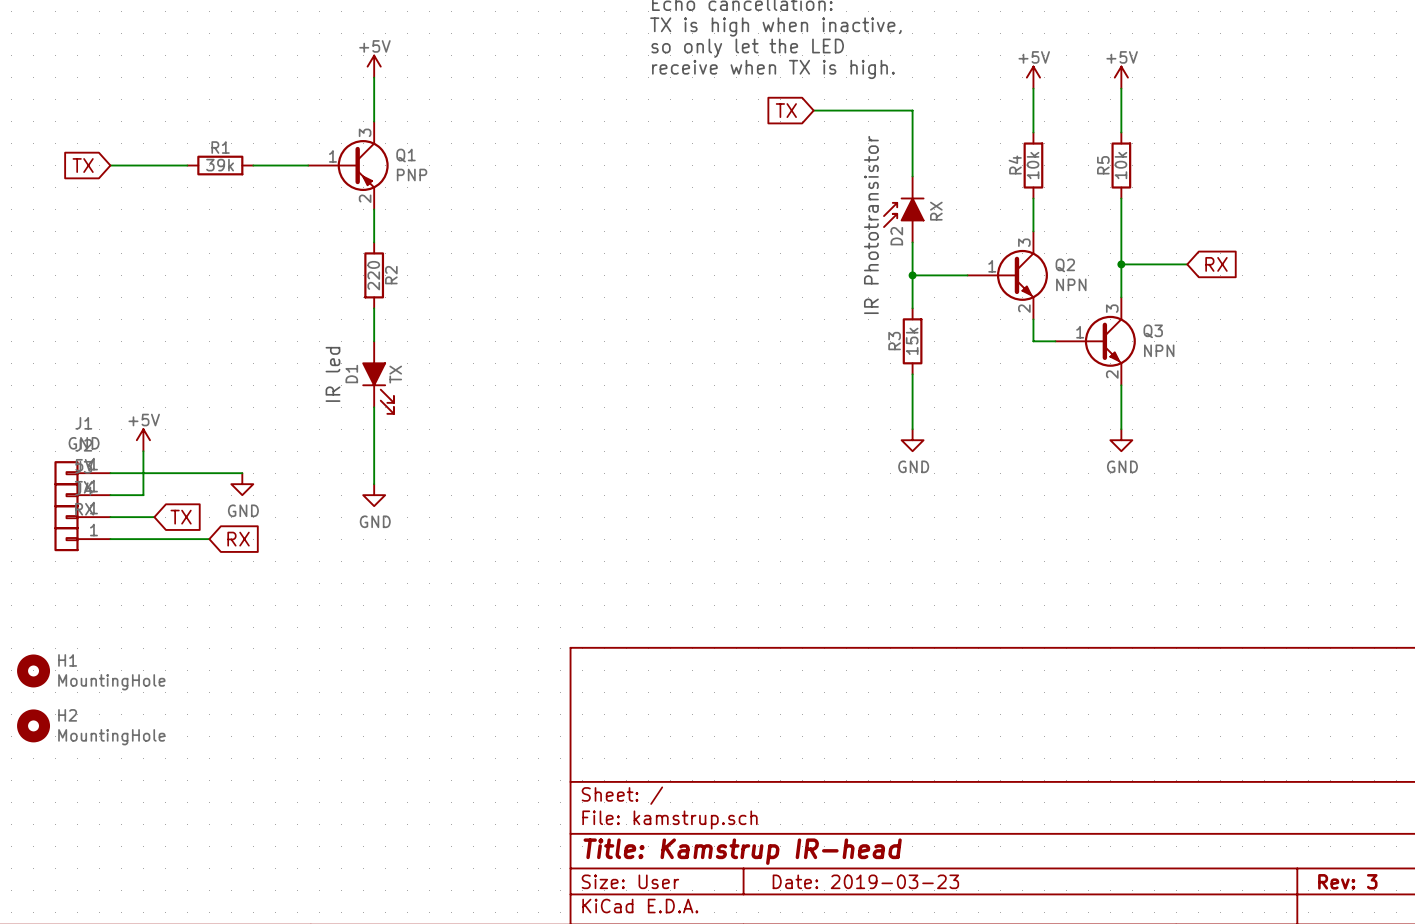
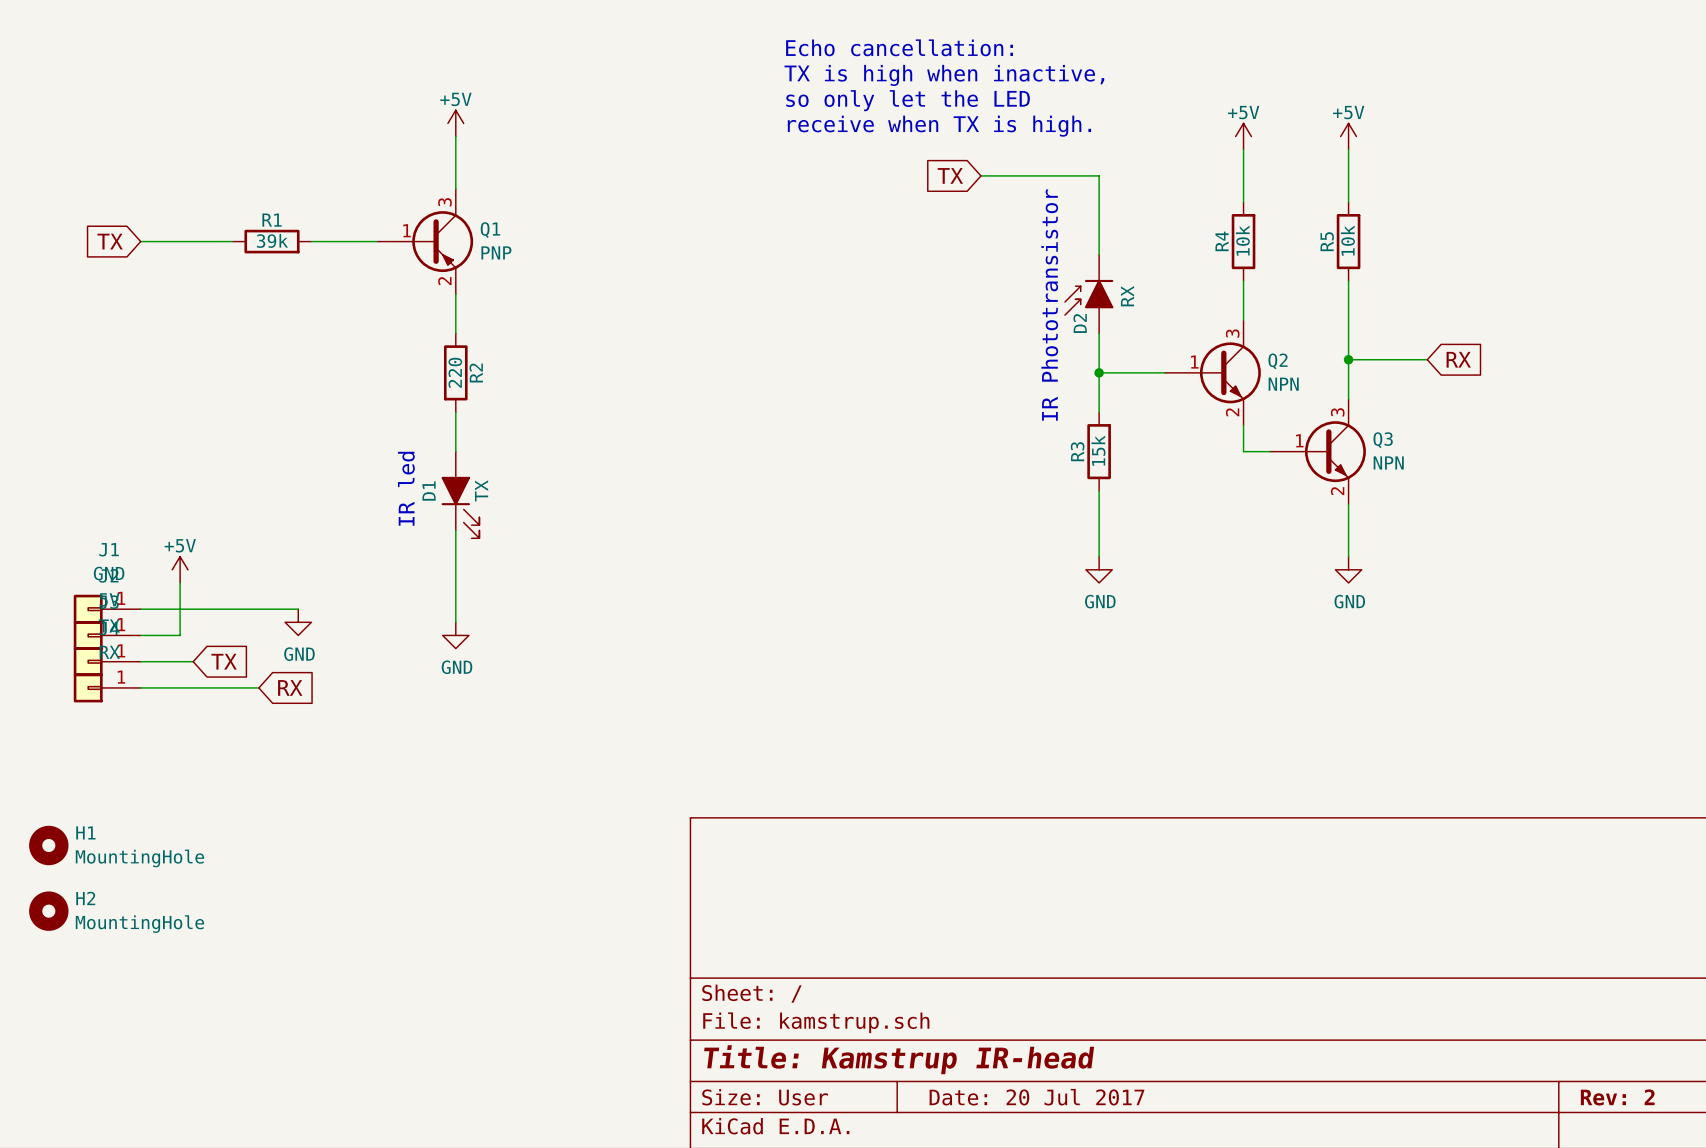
title block: Date: 2019-03-23 (865, 881) -> Date: 20 Jul 2017 (1036, 1097)
title block: Rev: 3 (1347, 881) -> Rev: 2 (1617, 1097)

